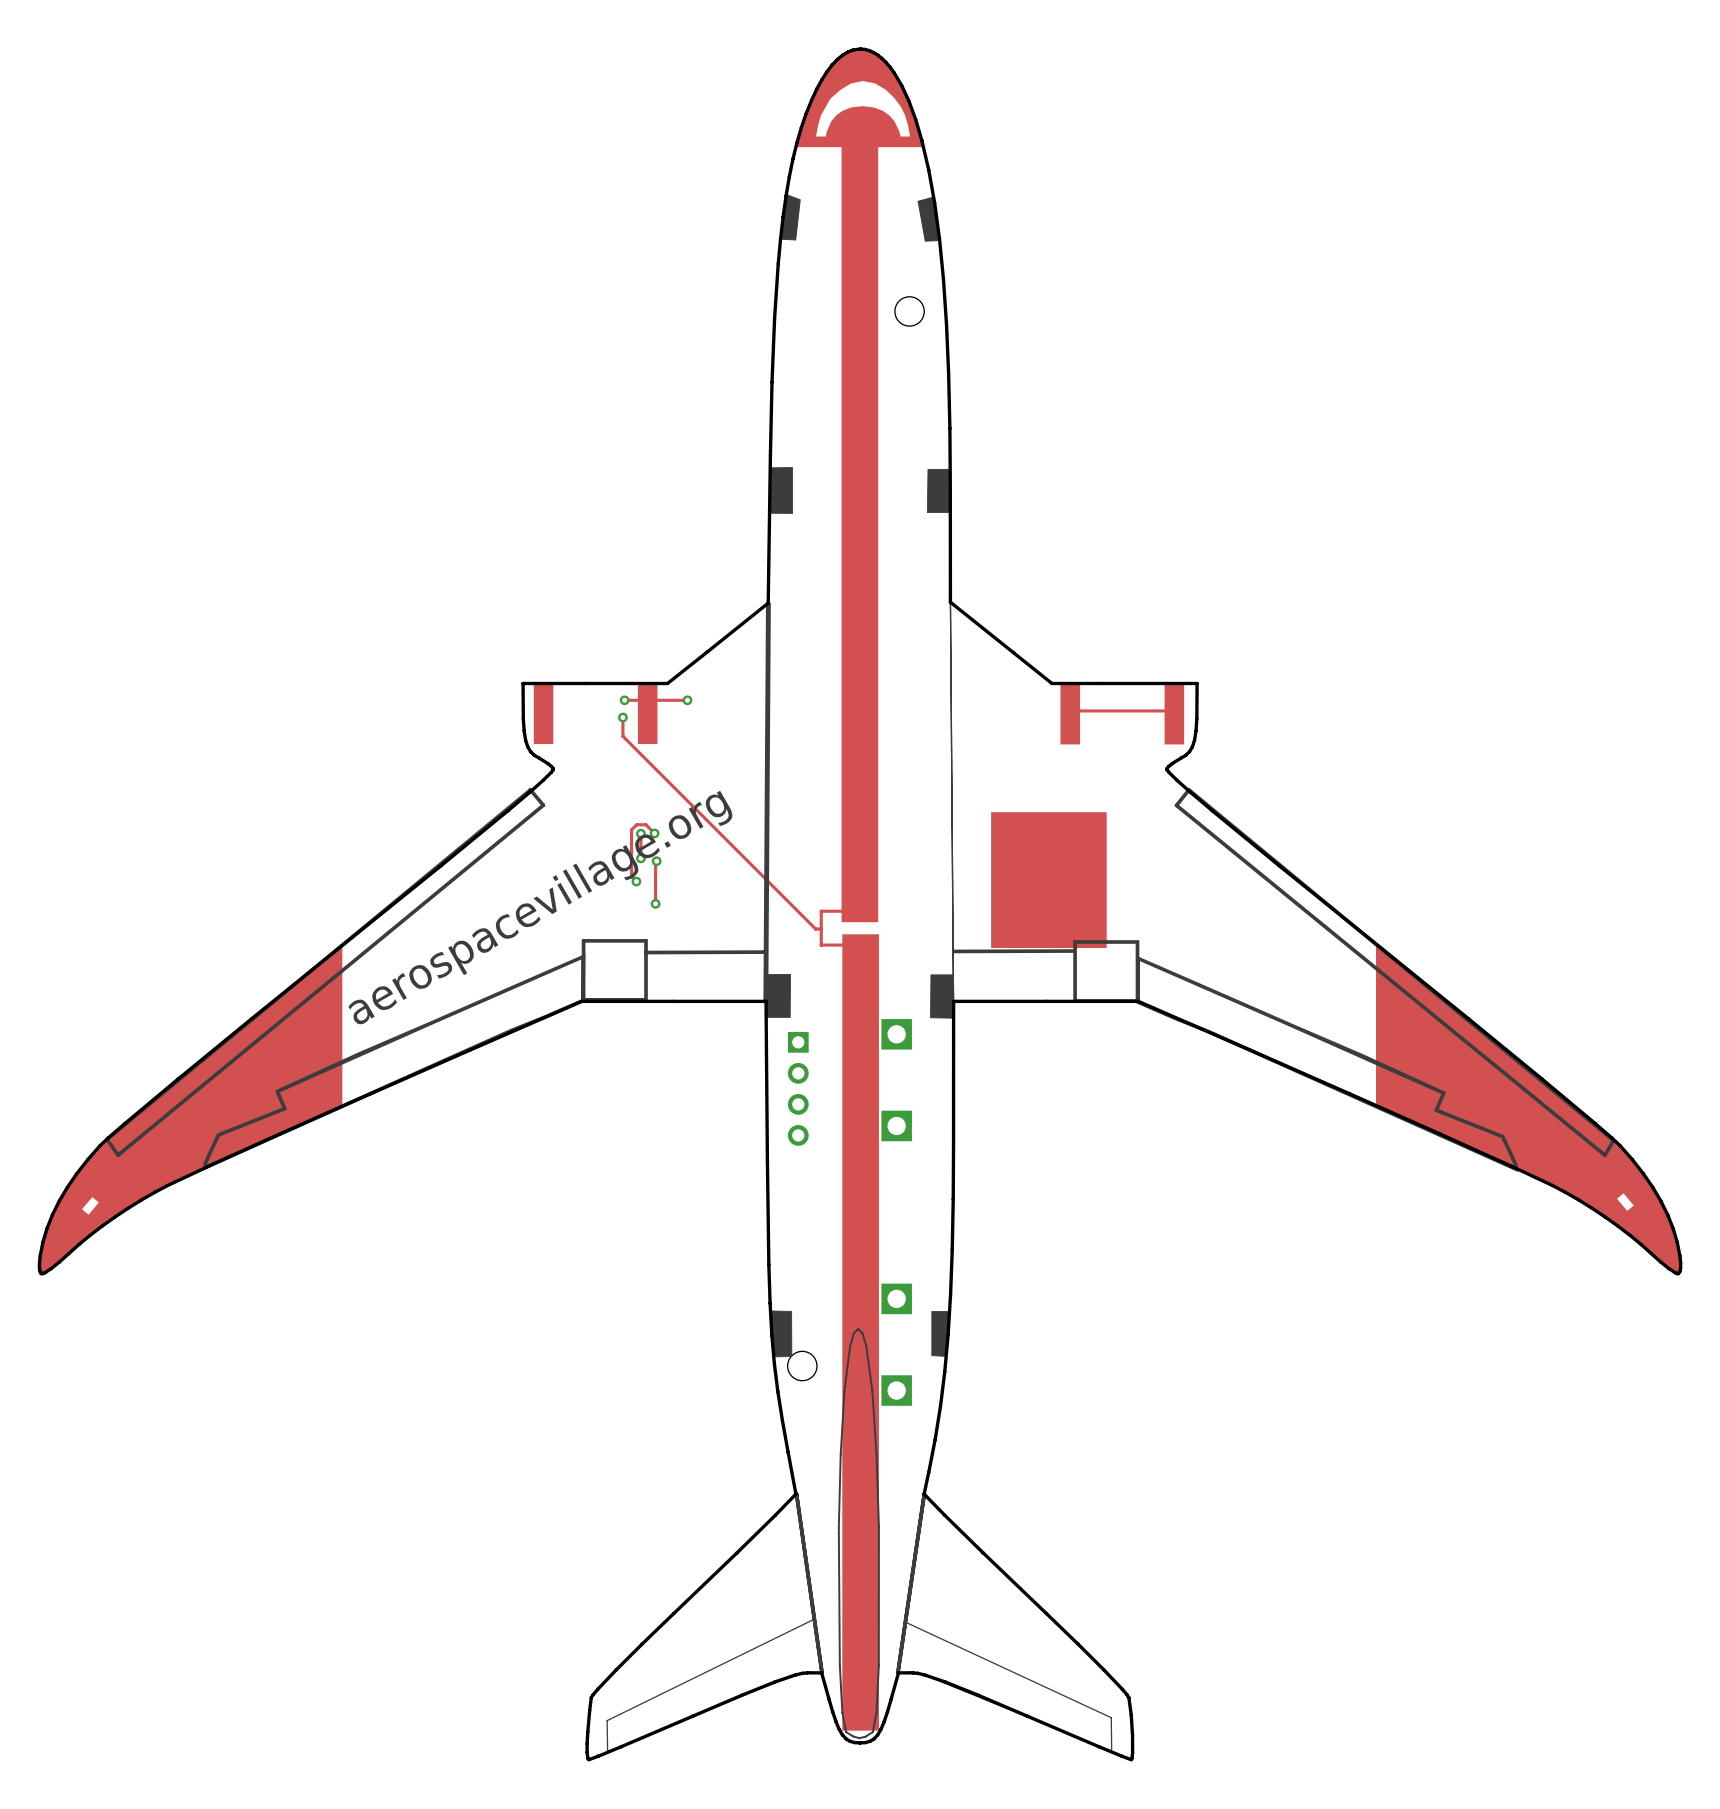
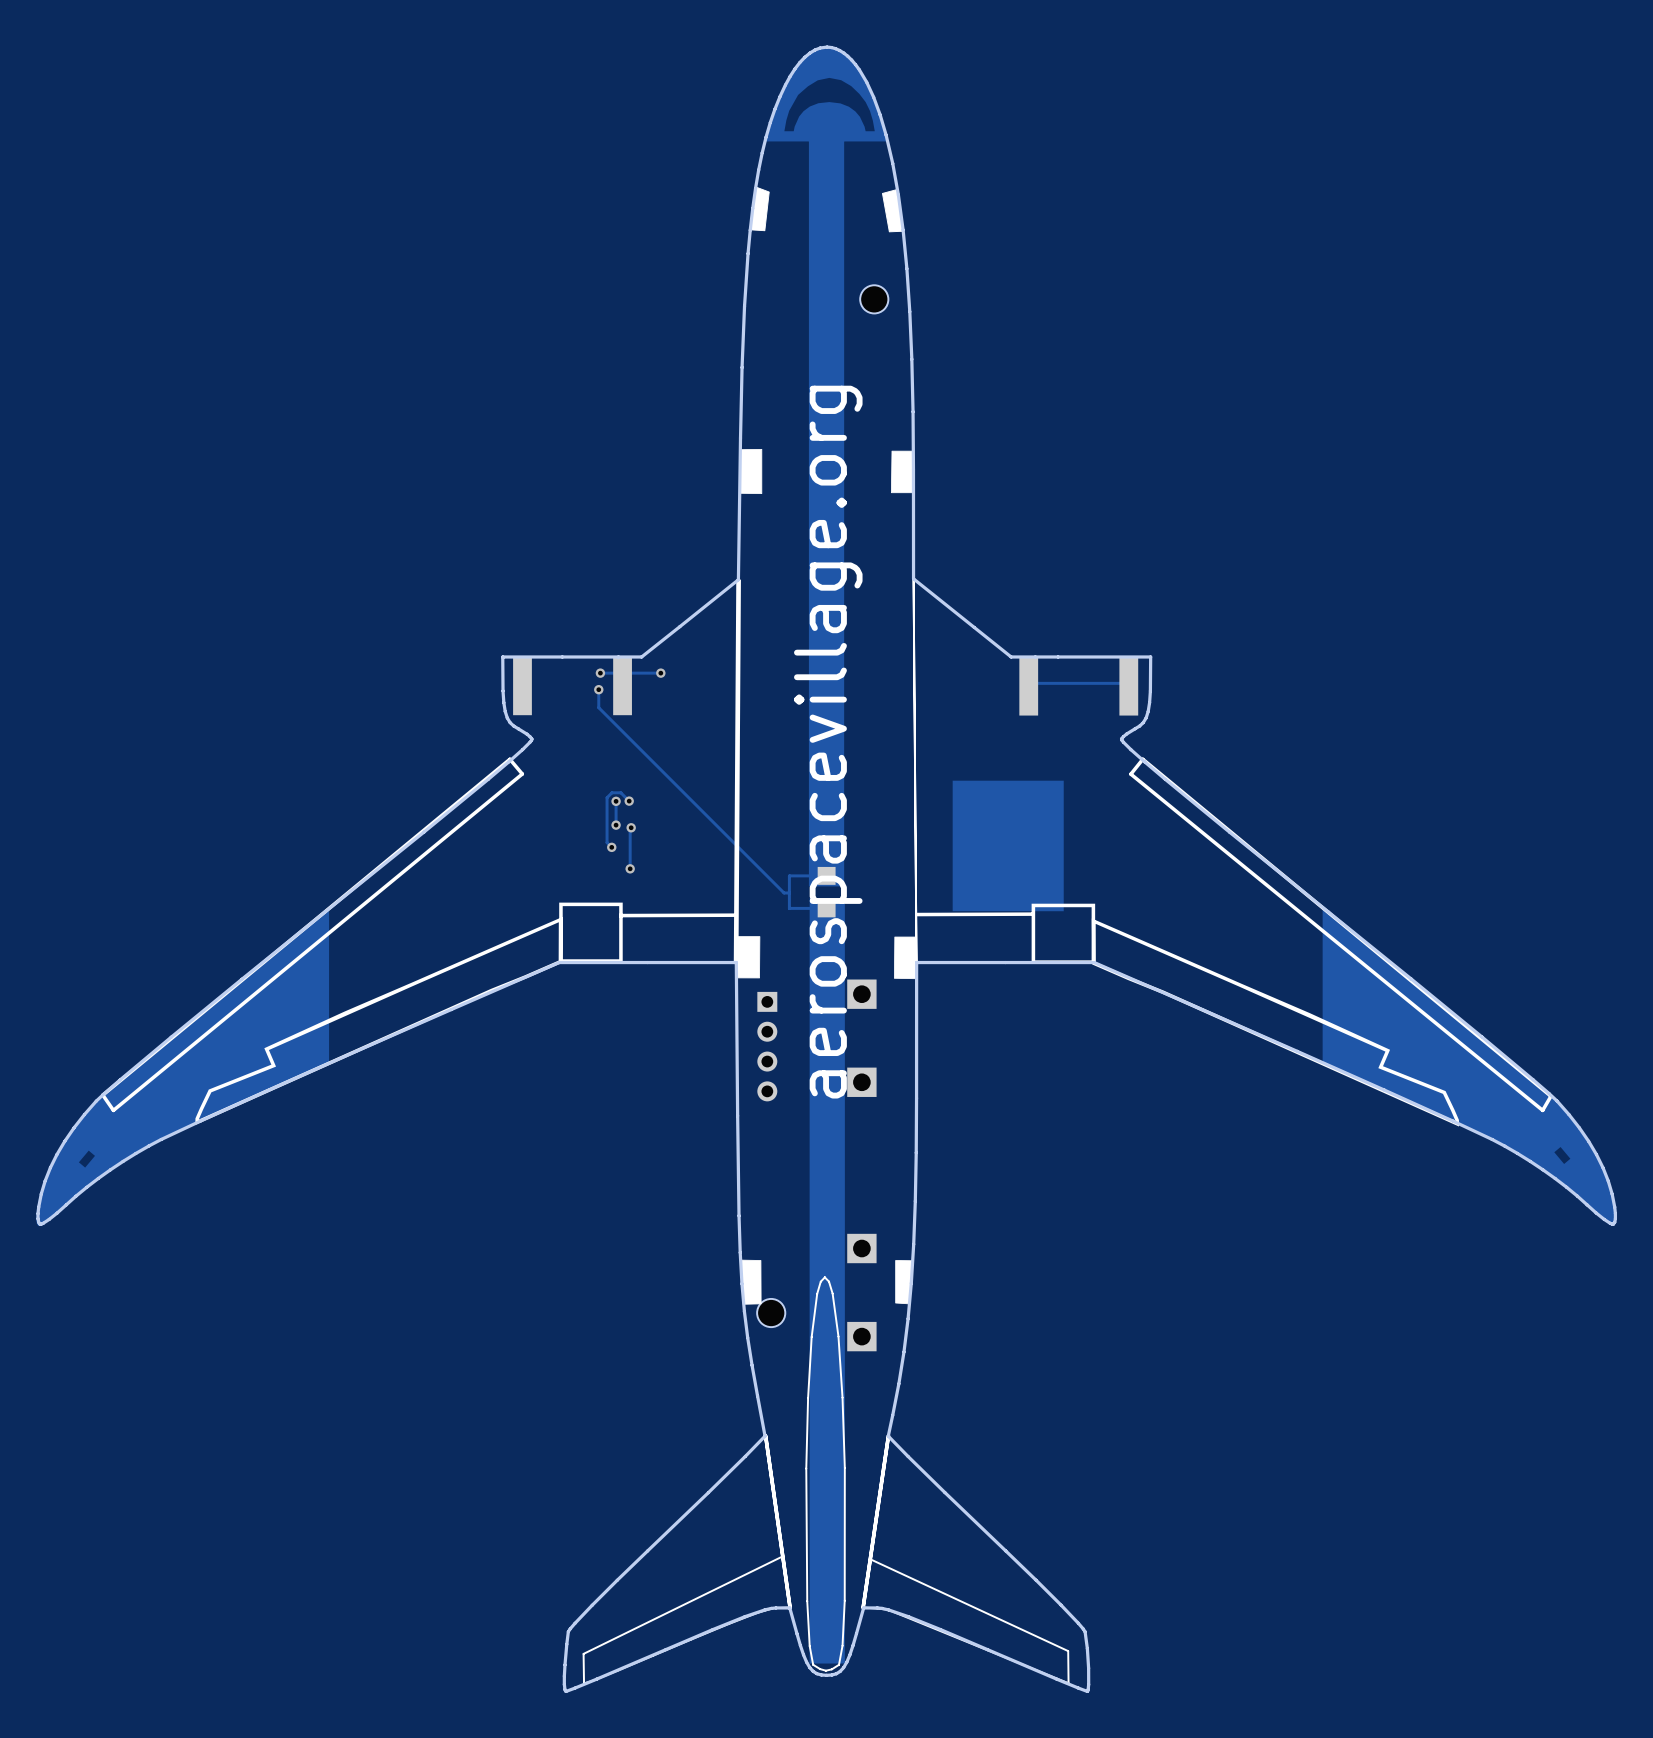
text: none -> aerospacevillage.org (828, 742)
text: aerospacevillage.org (540, 907) -> none

